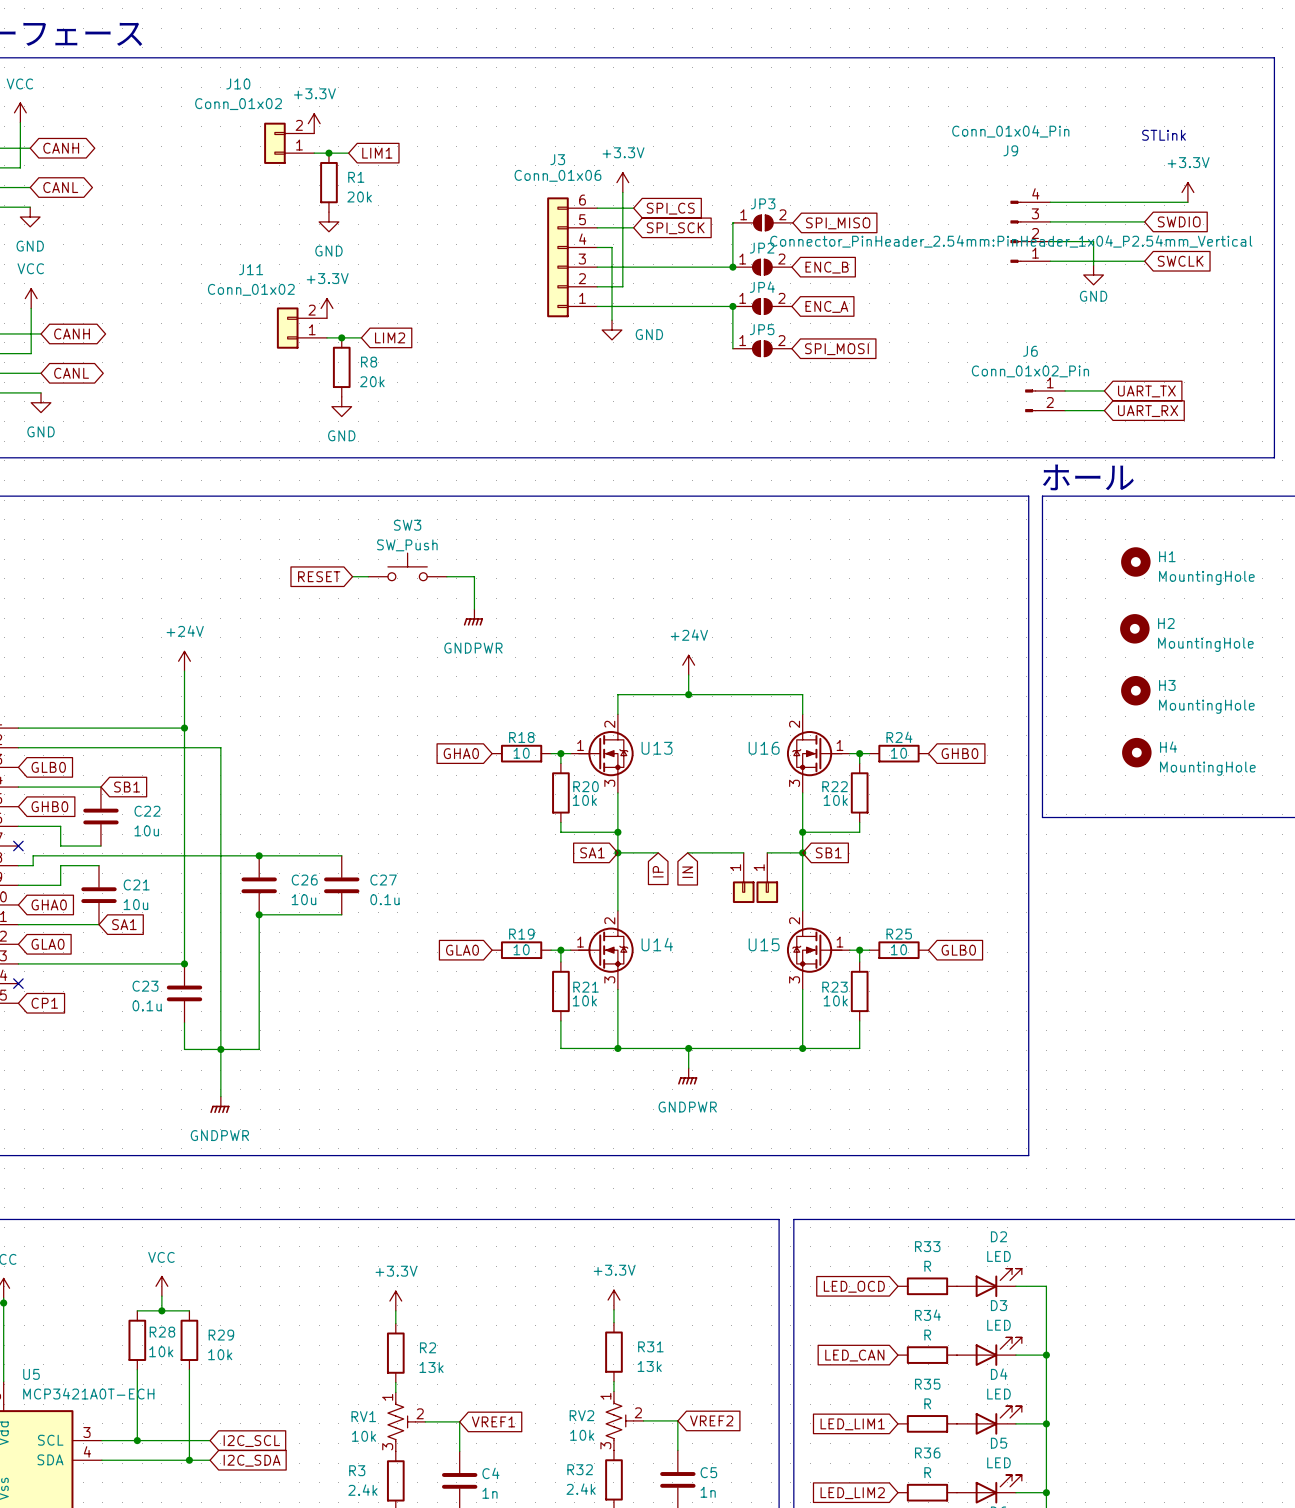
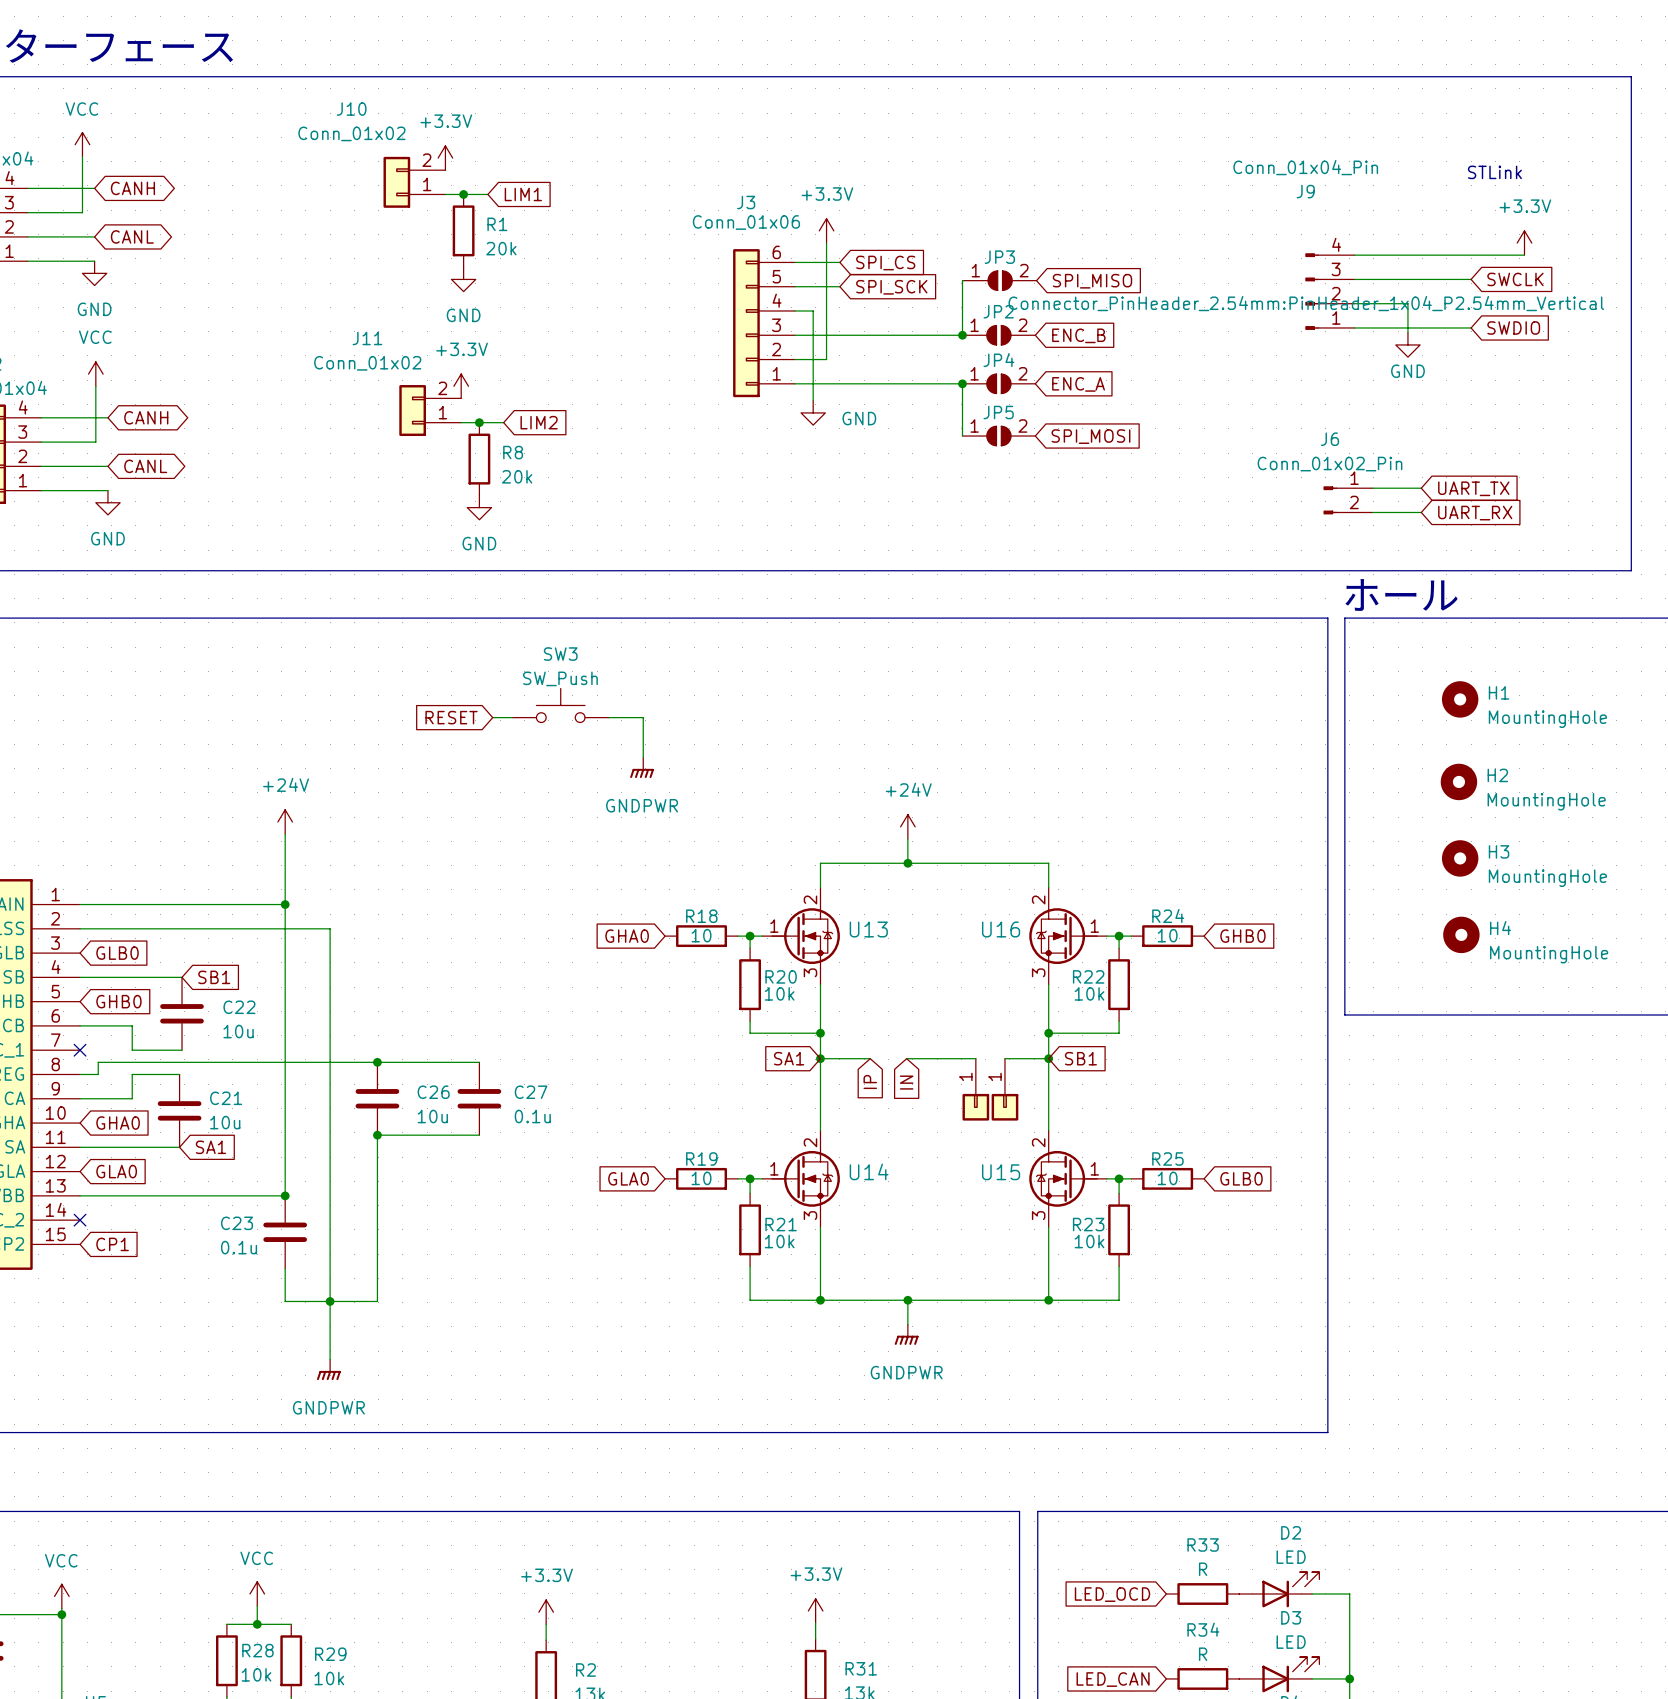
global label: SWDIO (1179, 221) -> SWCLK (1515, 279)
global label: SWCLK (1180, 261) -> SWDIO (1513, 327)

